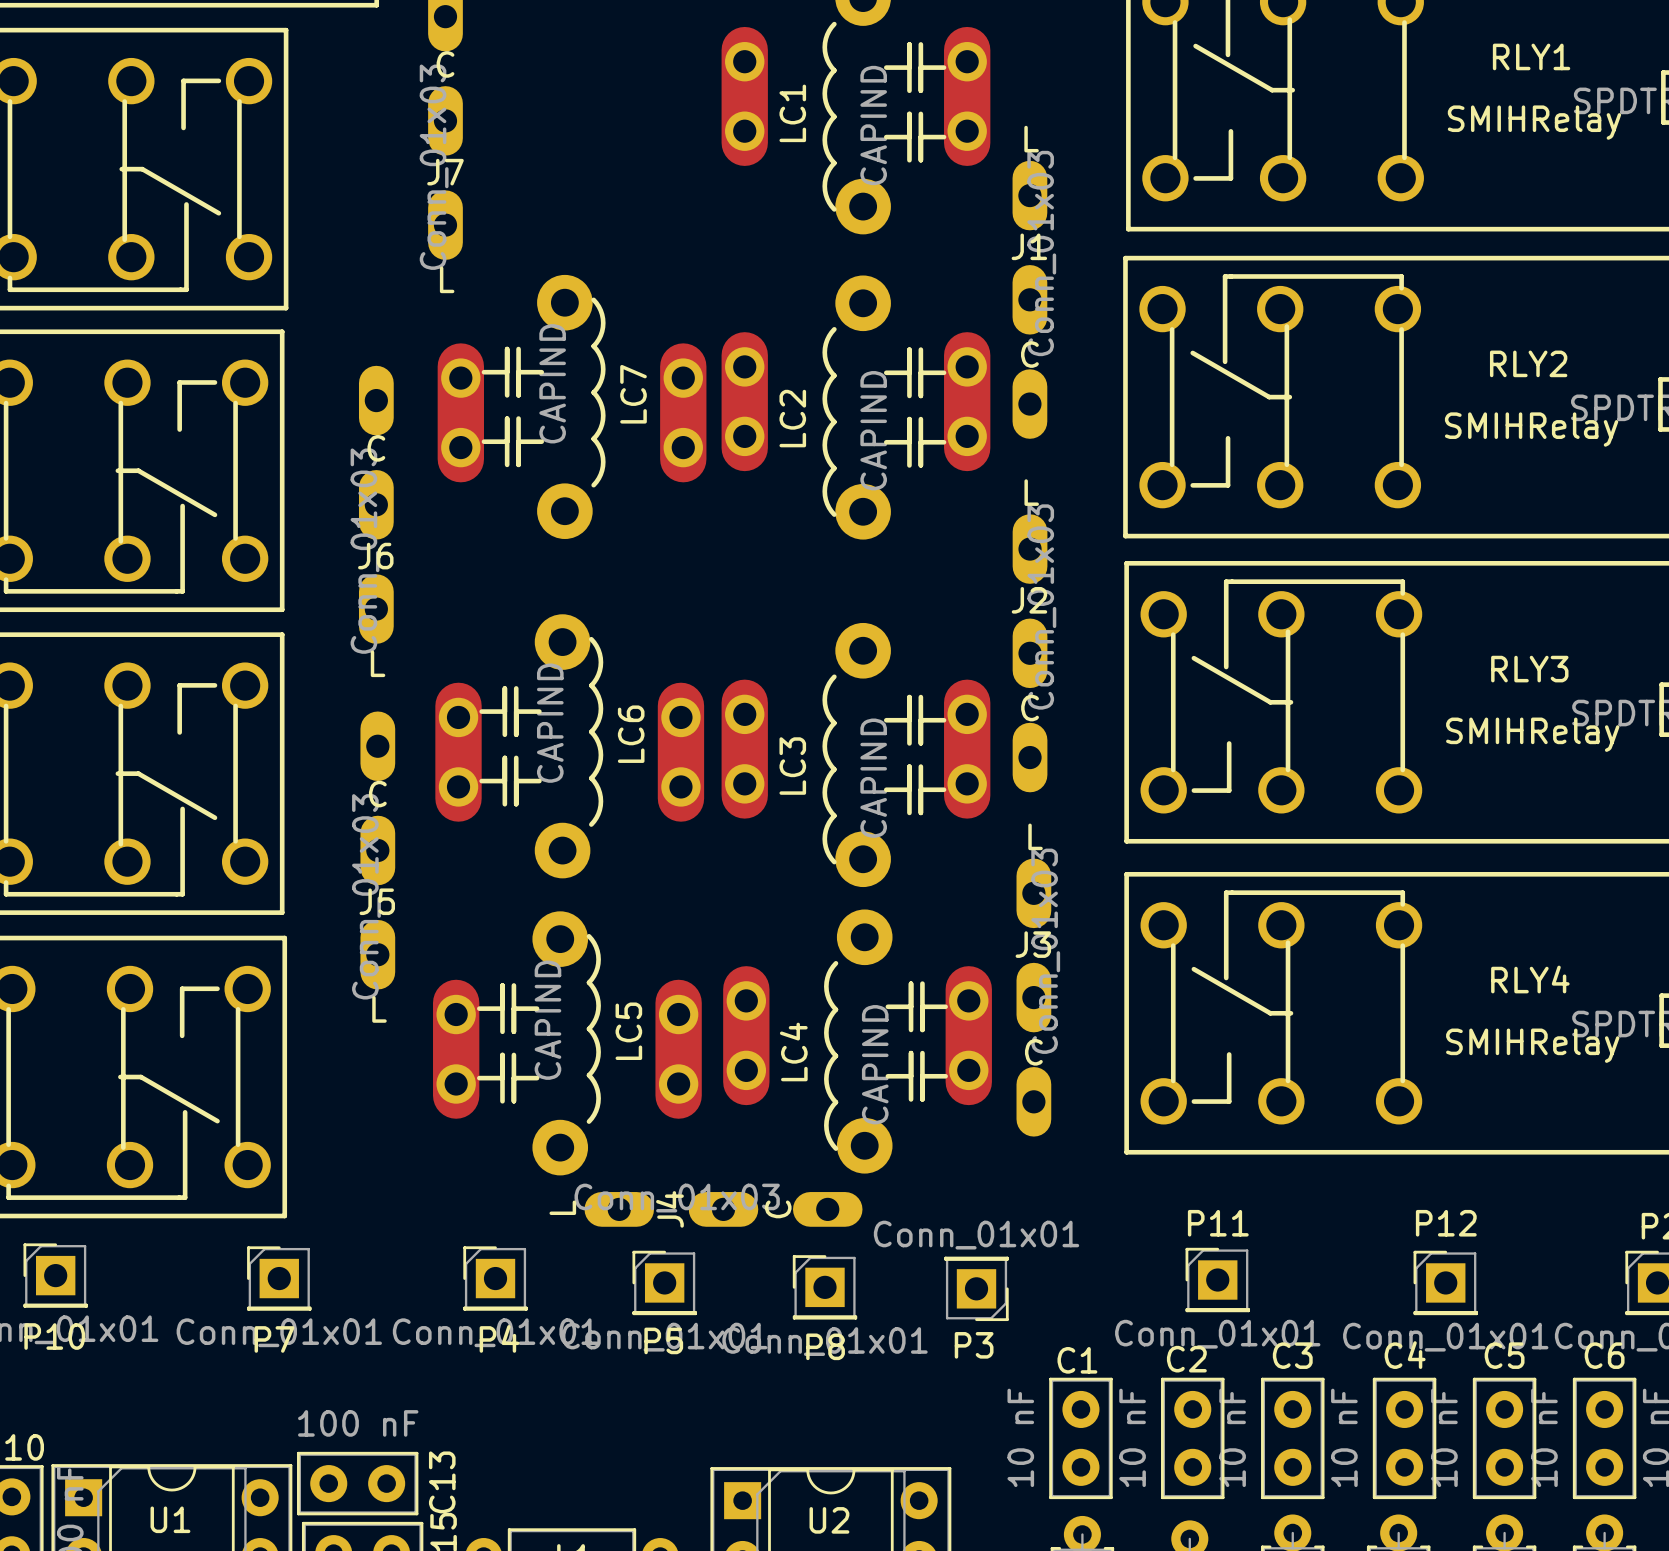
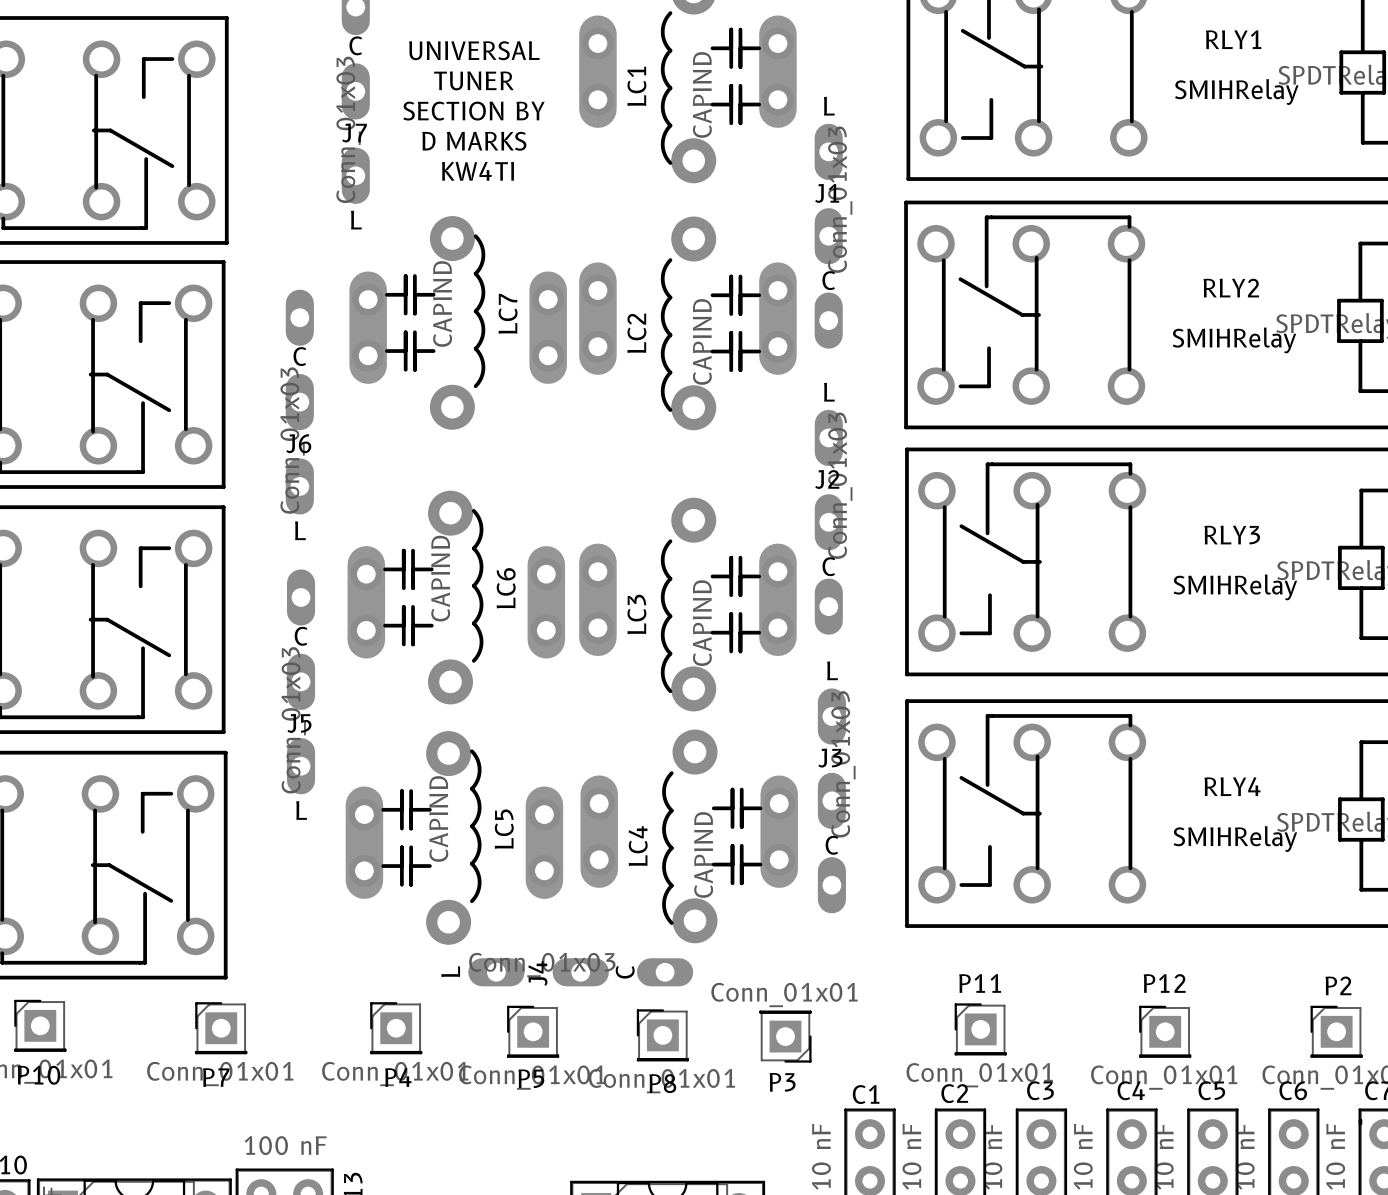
text: none -> UNIVERSAL (474, 50)
text: none -> TUNER (473, 80)
text: none -> SECTION BY (473, 111)
text: none -> D MARKS (474, 141)
text: none -> KW4TI (477, 171)

